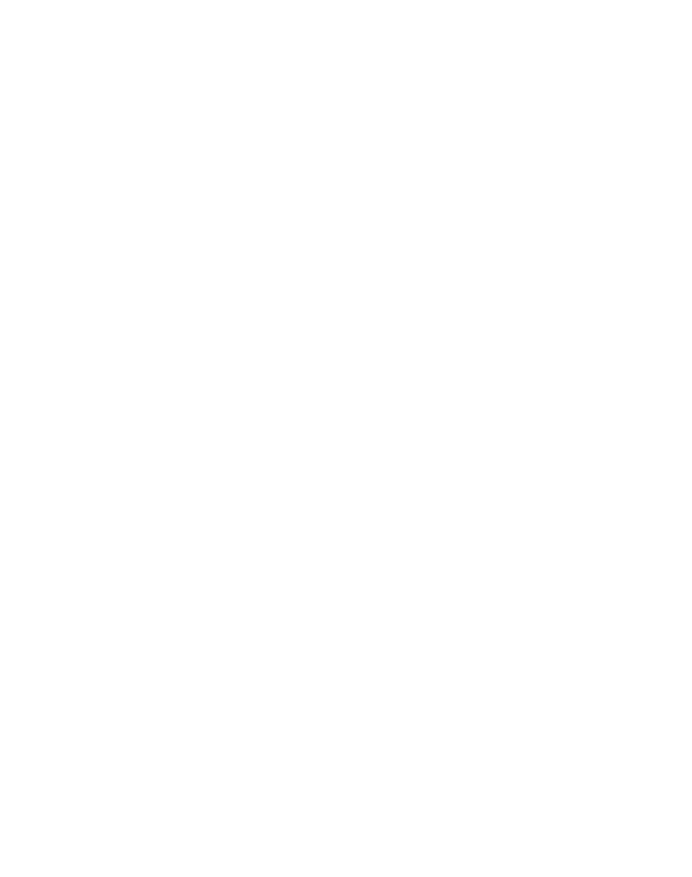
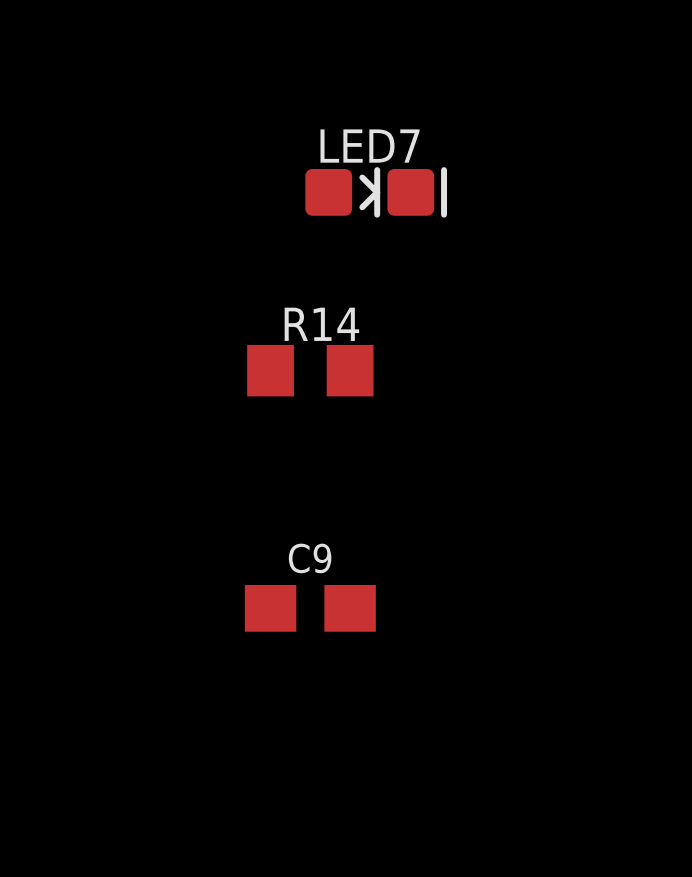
LED7: none -> (376, 192)
R14: none -> (310, 370)
C9: none -> (310, 608)

